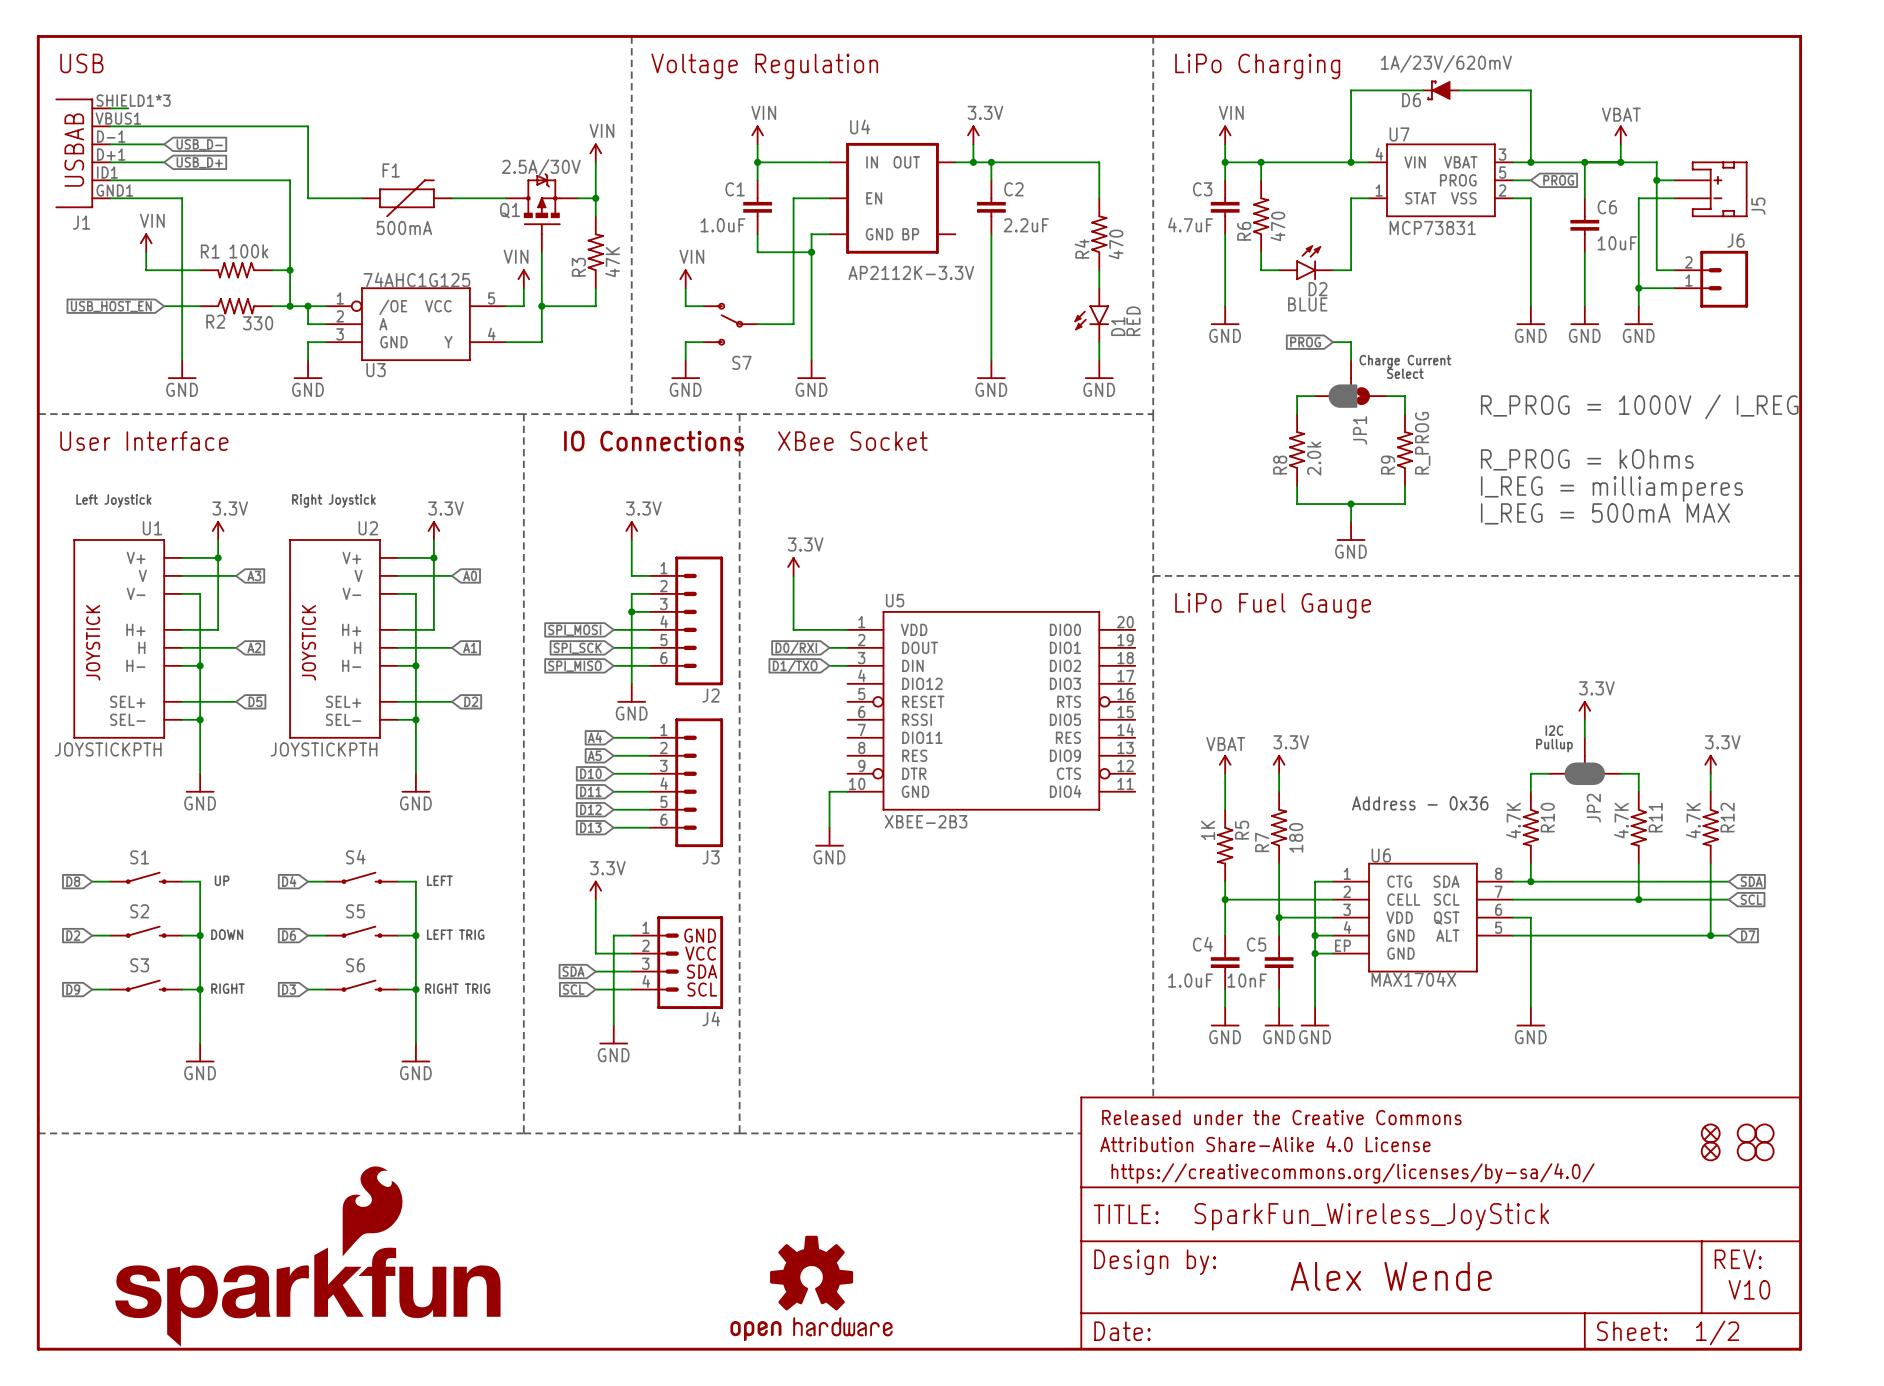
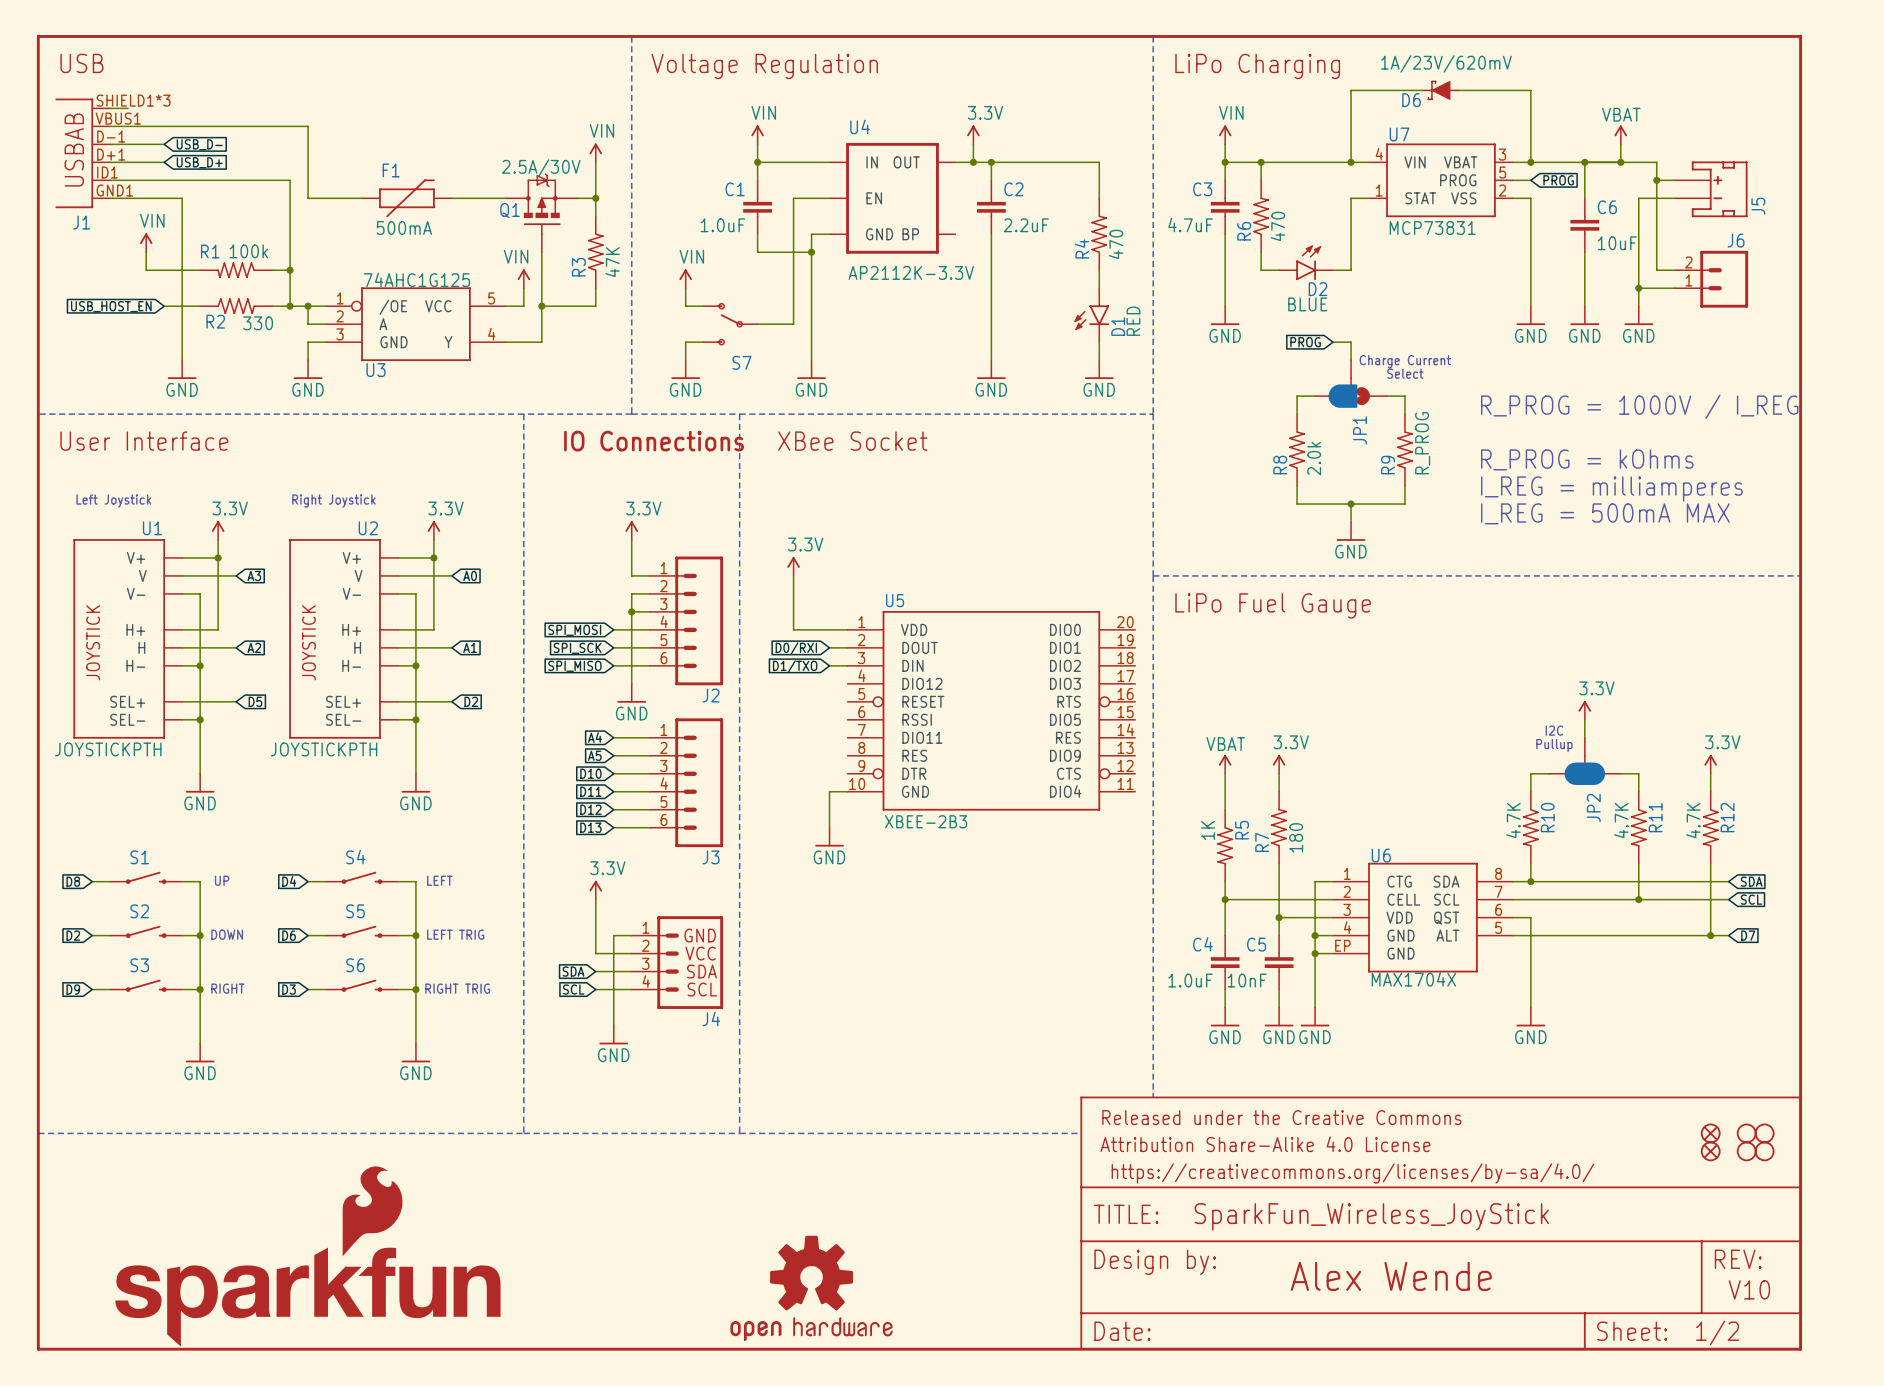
text: Address - 0x36 (1420, 803) -> none

